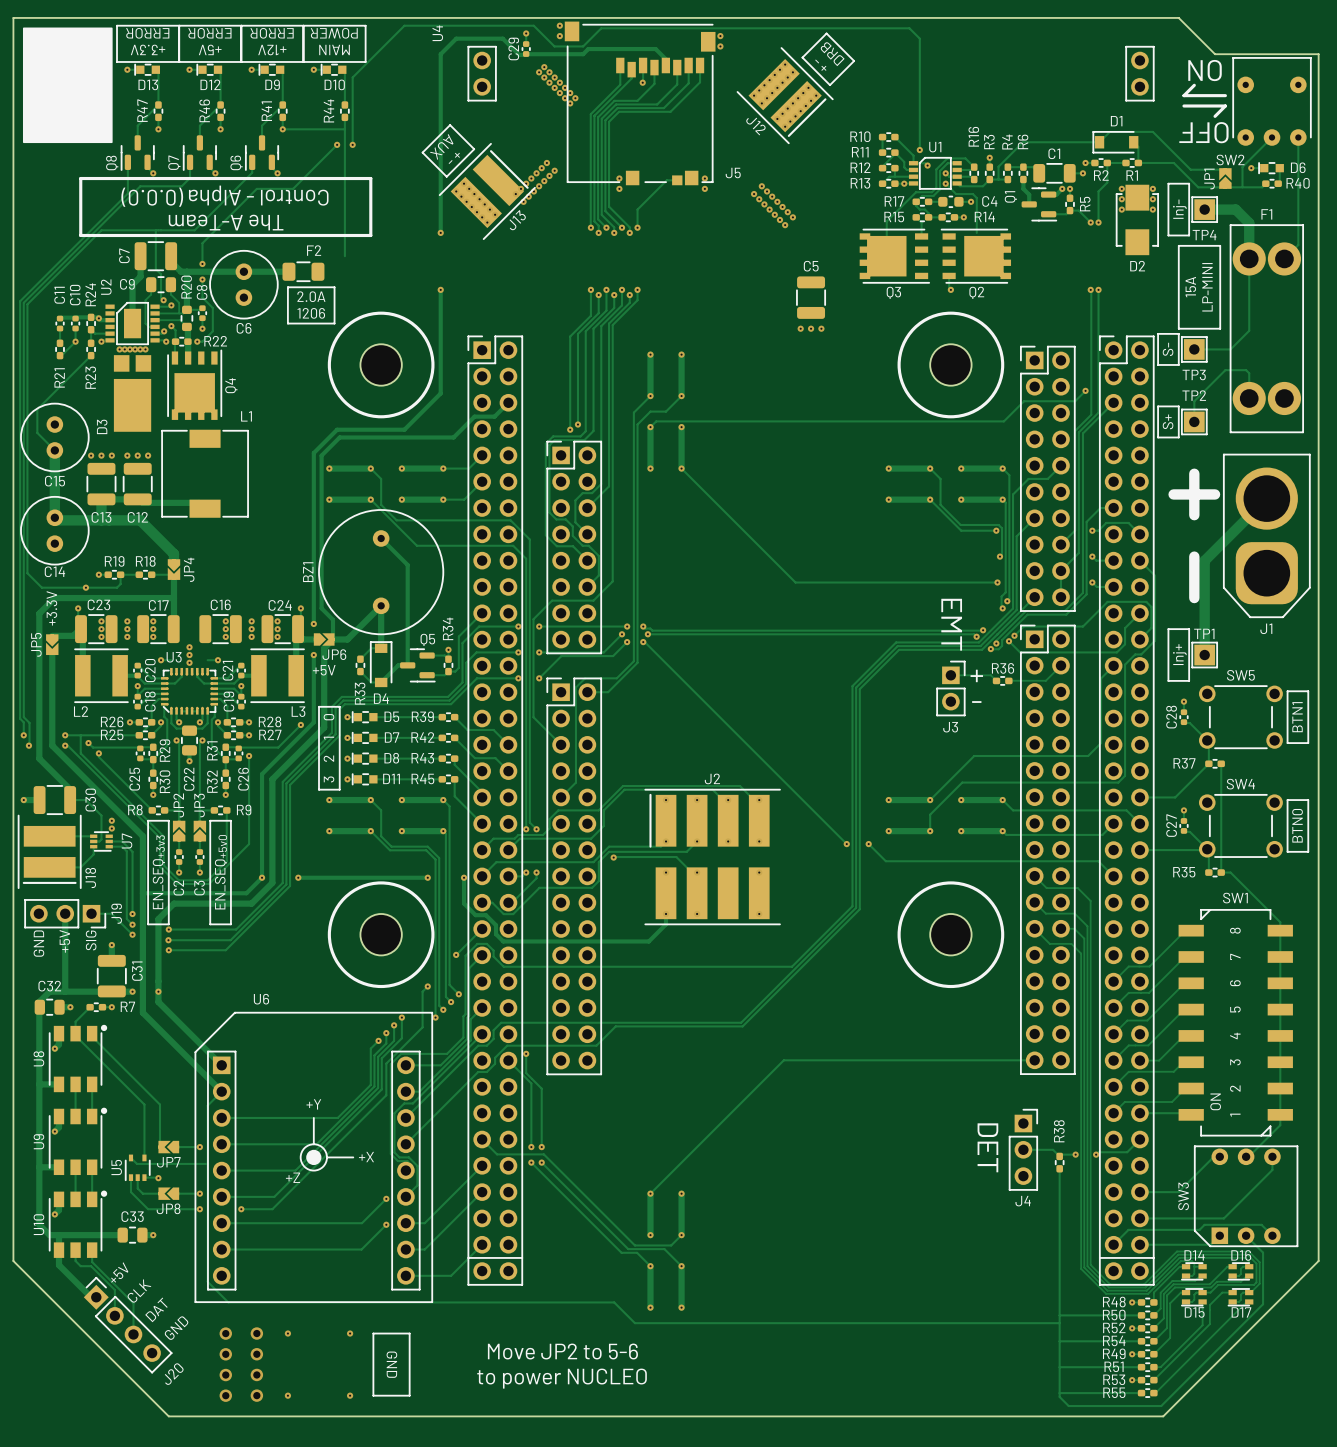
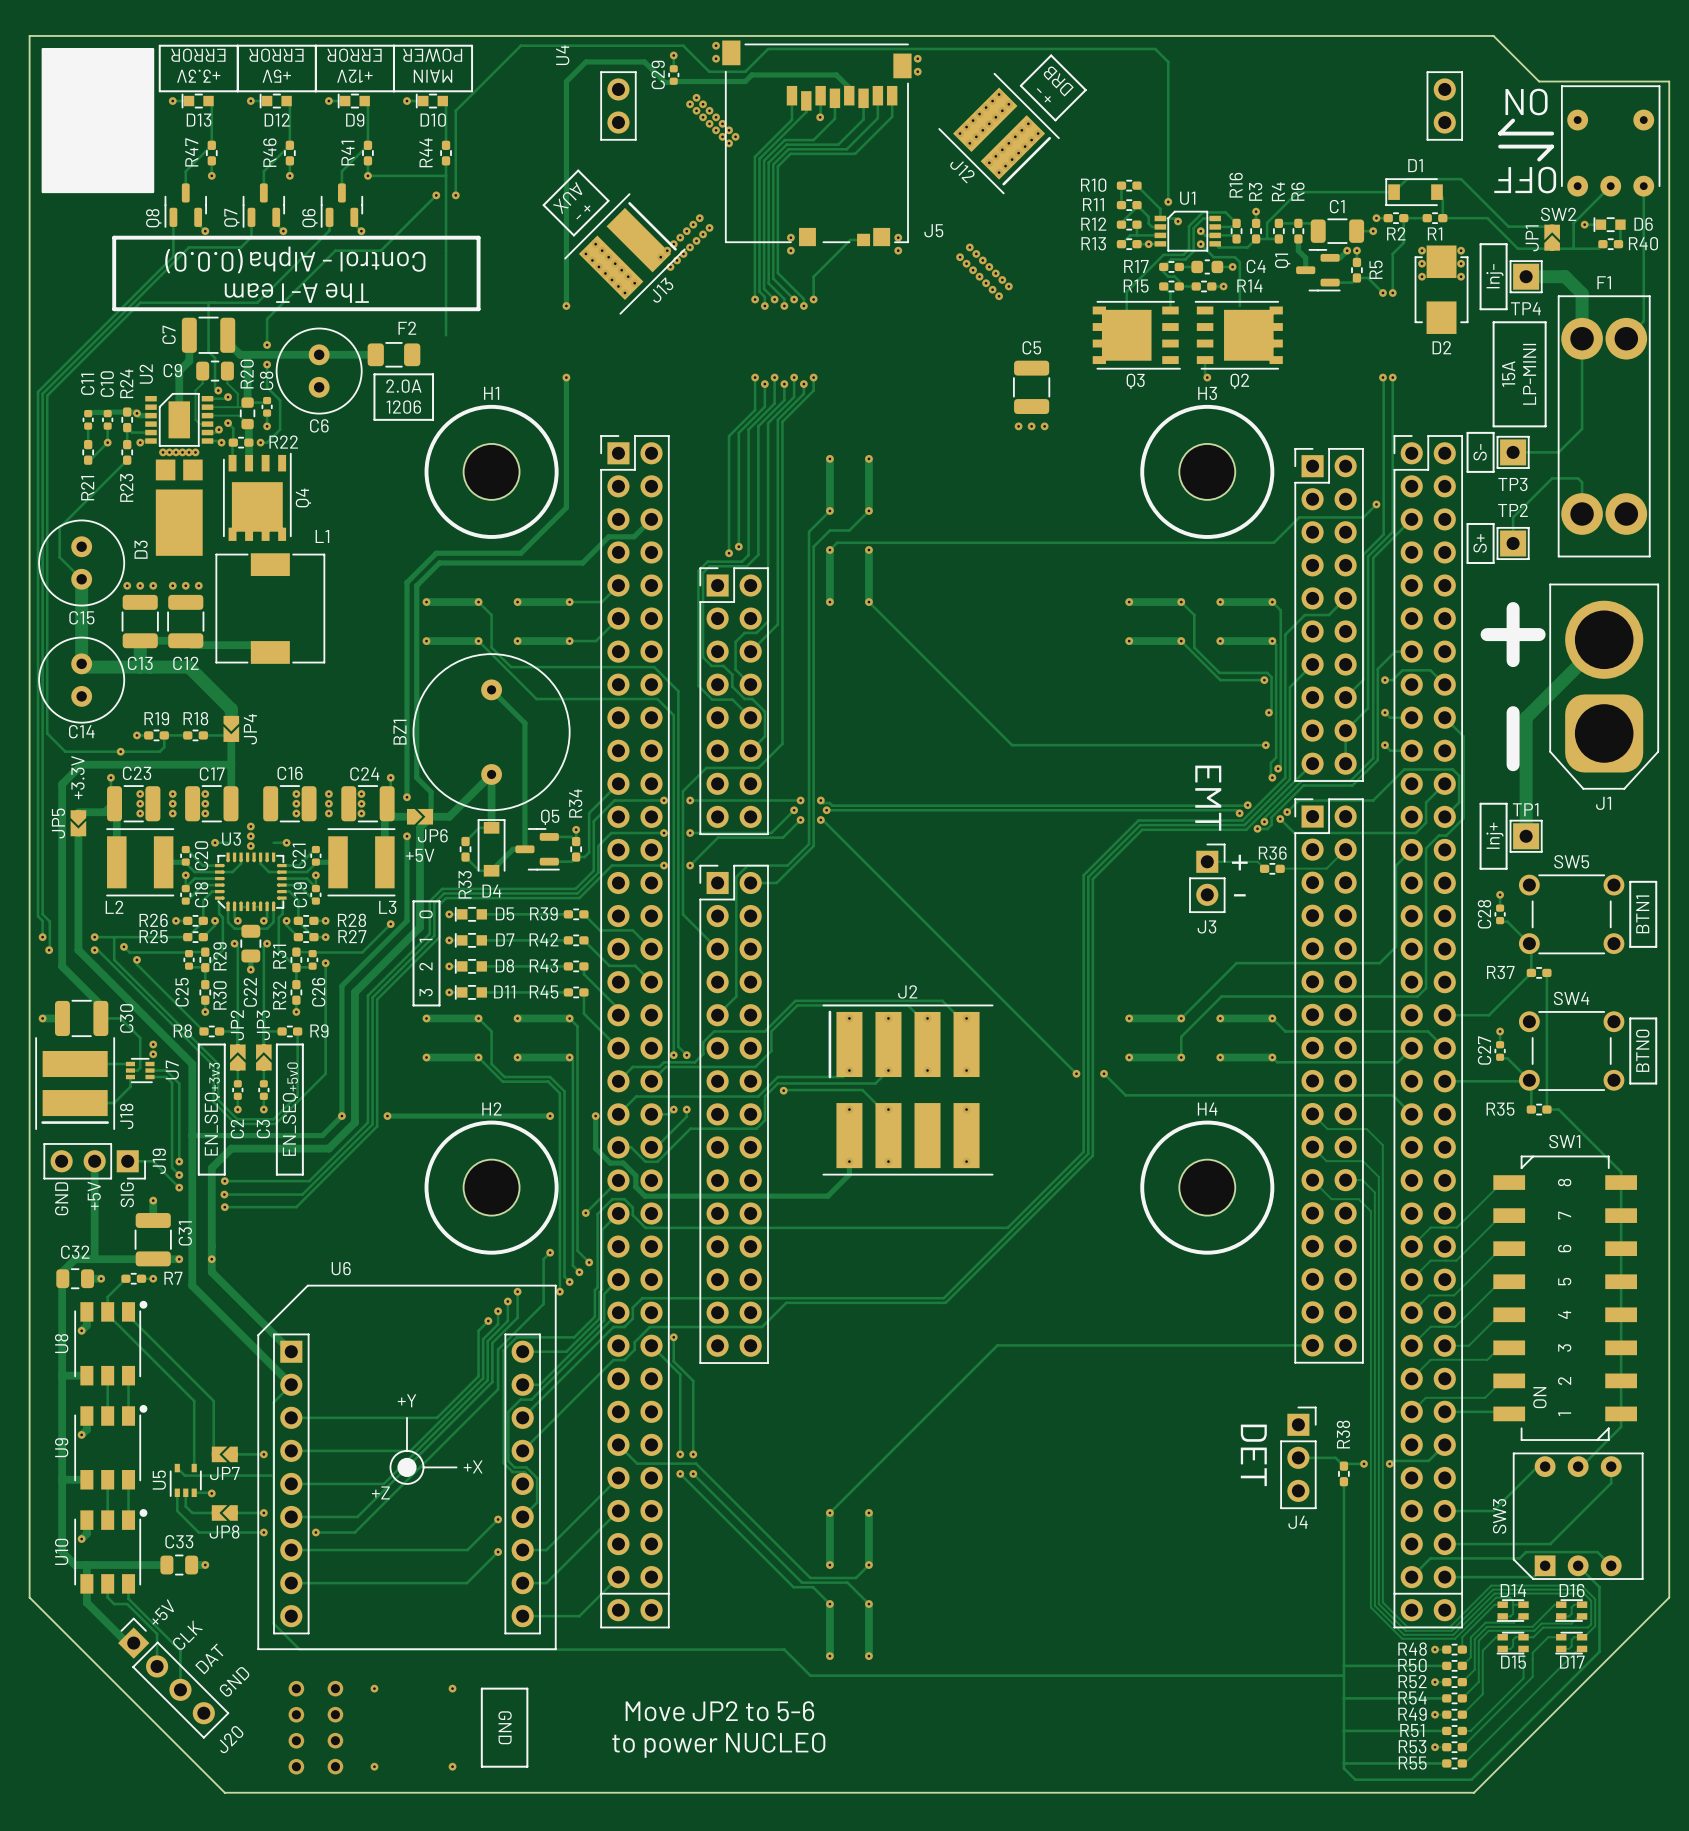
part: (381, 364) -> none
H1: none -> (491, 471)
part: (950, 364) -> none
H3: none -> (1207, 471)
part: (381, 934) -> none
H2: none -> (491, 1187)
part: (950, 934) -> none
H4: none -> (1207, 1187)

